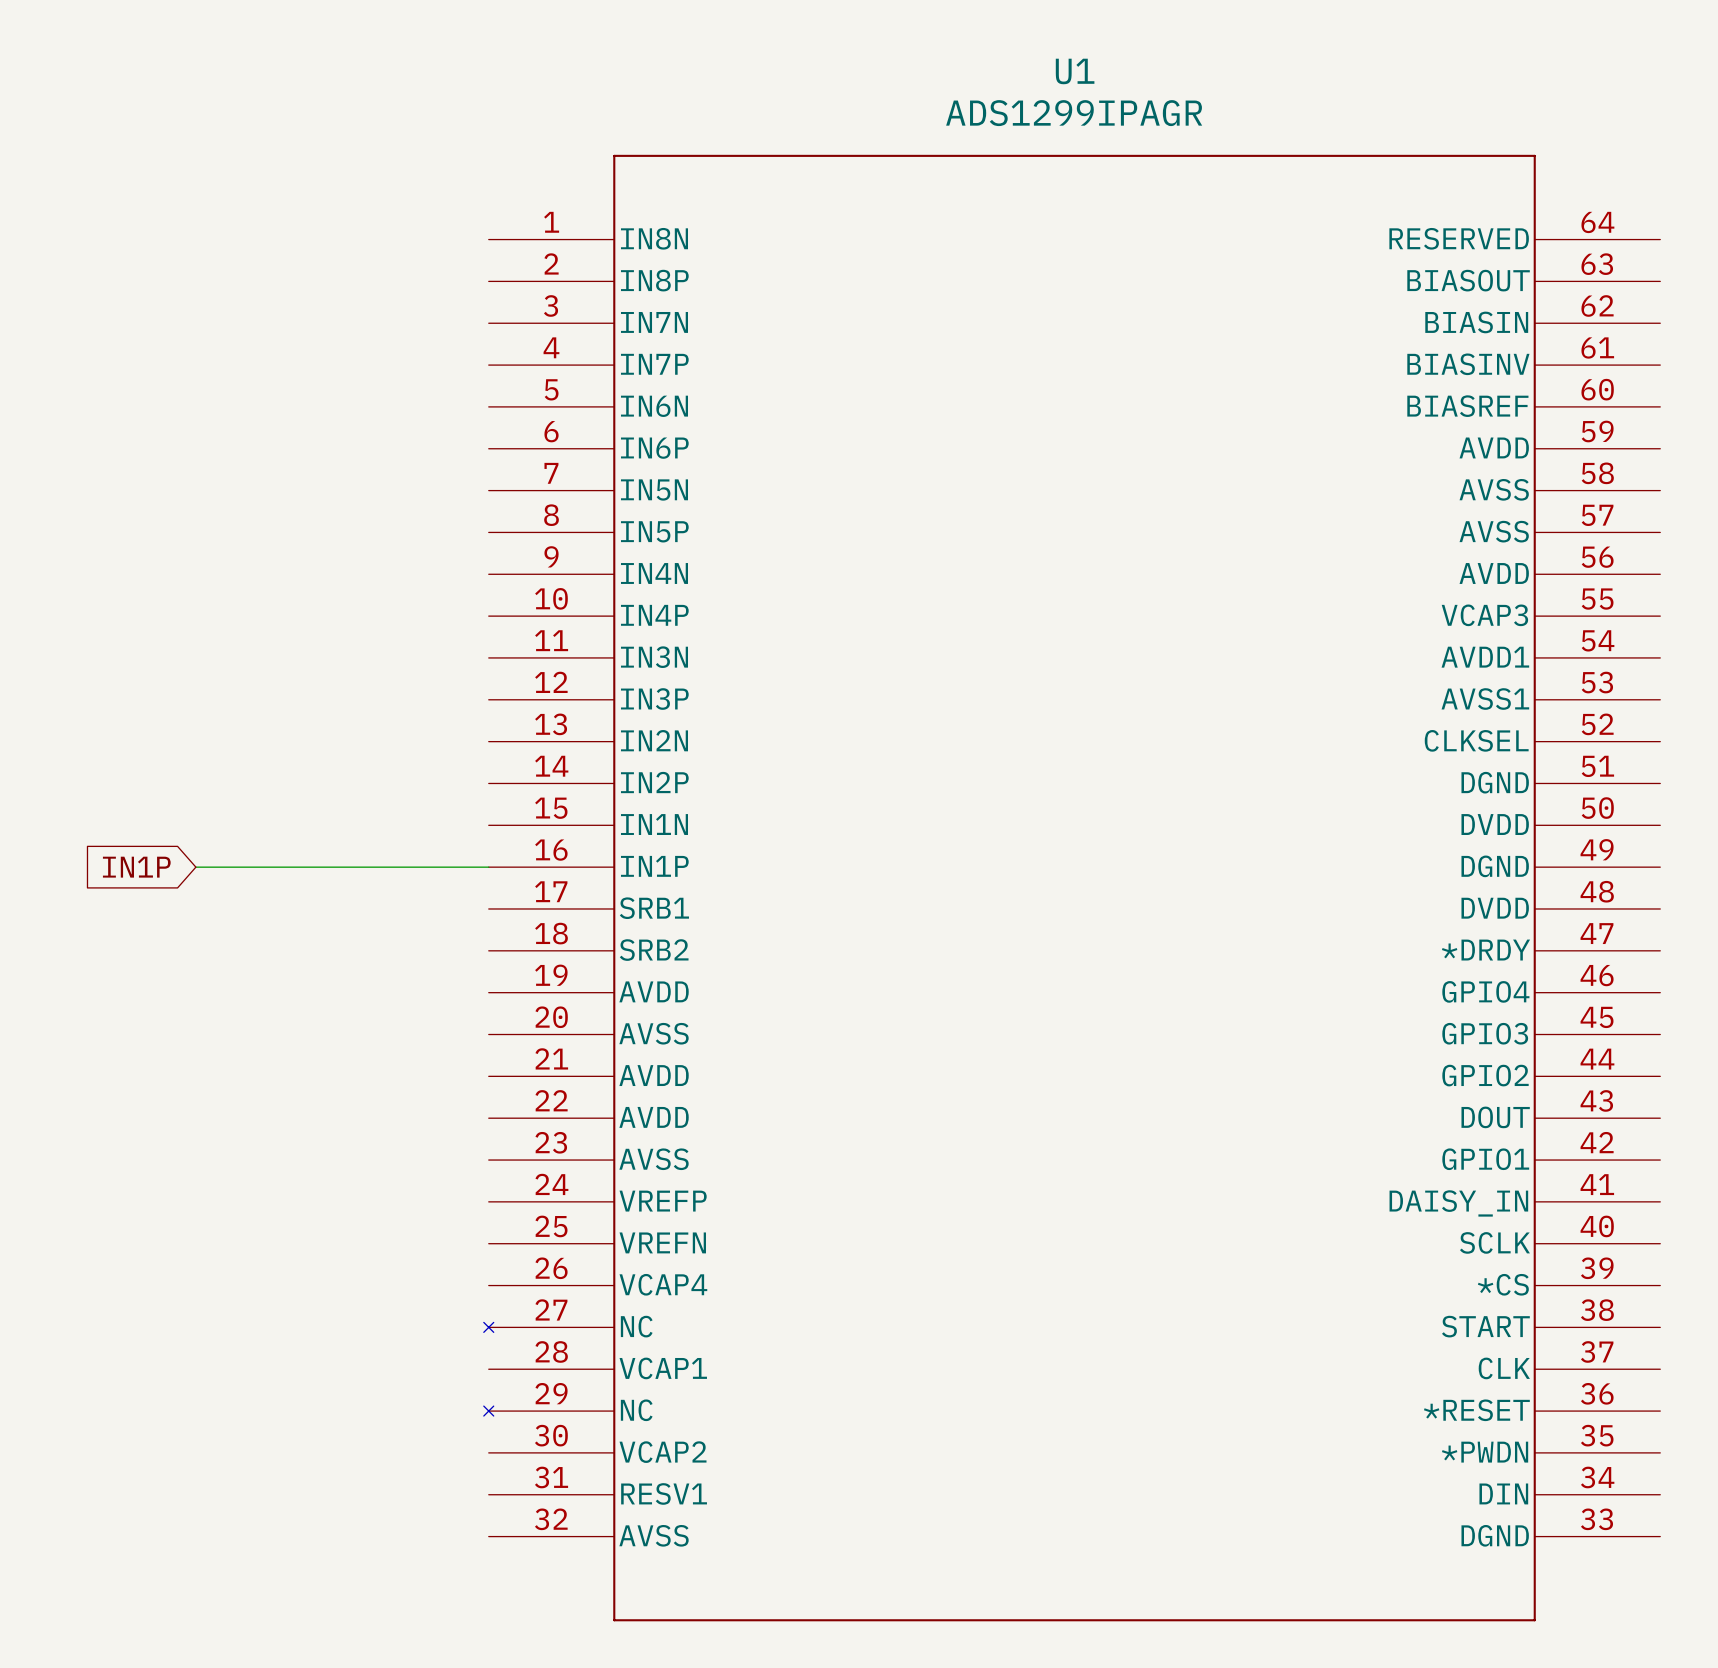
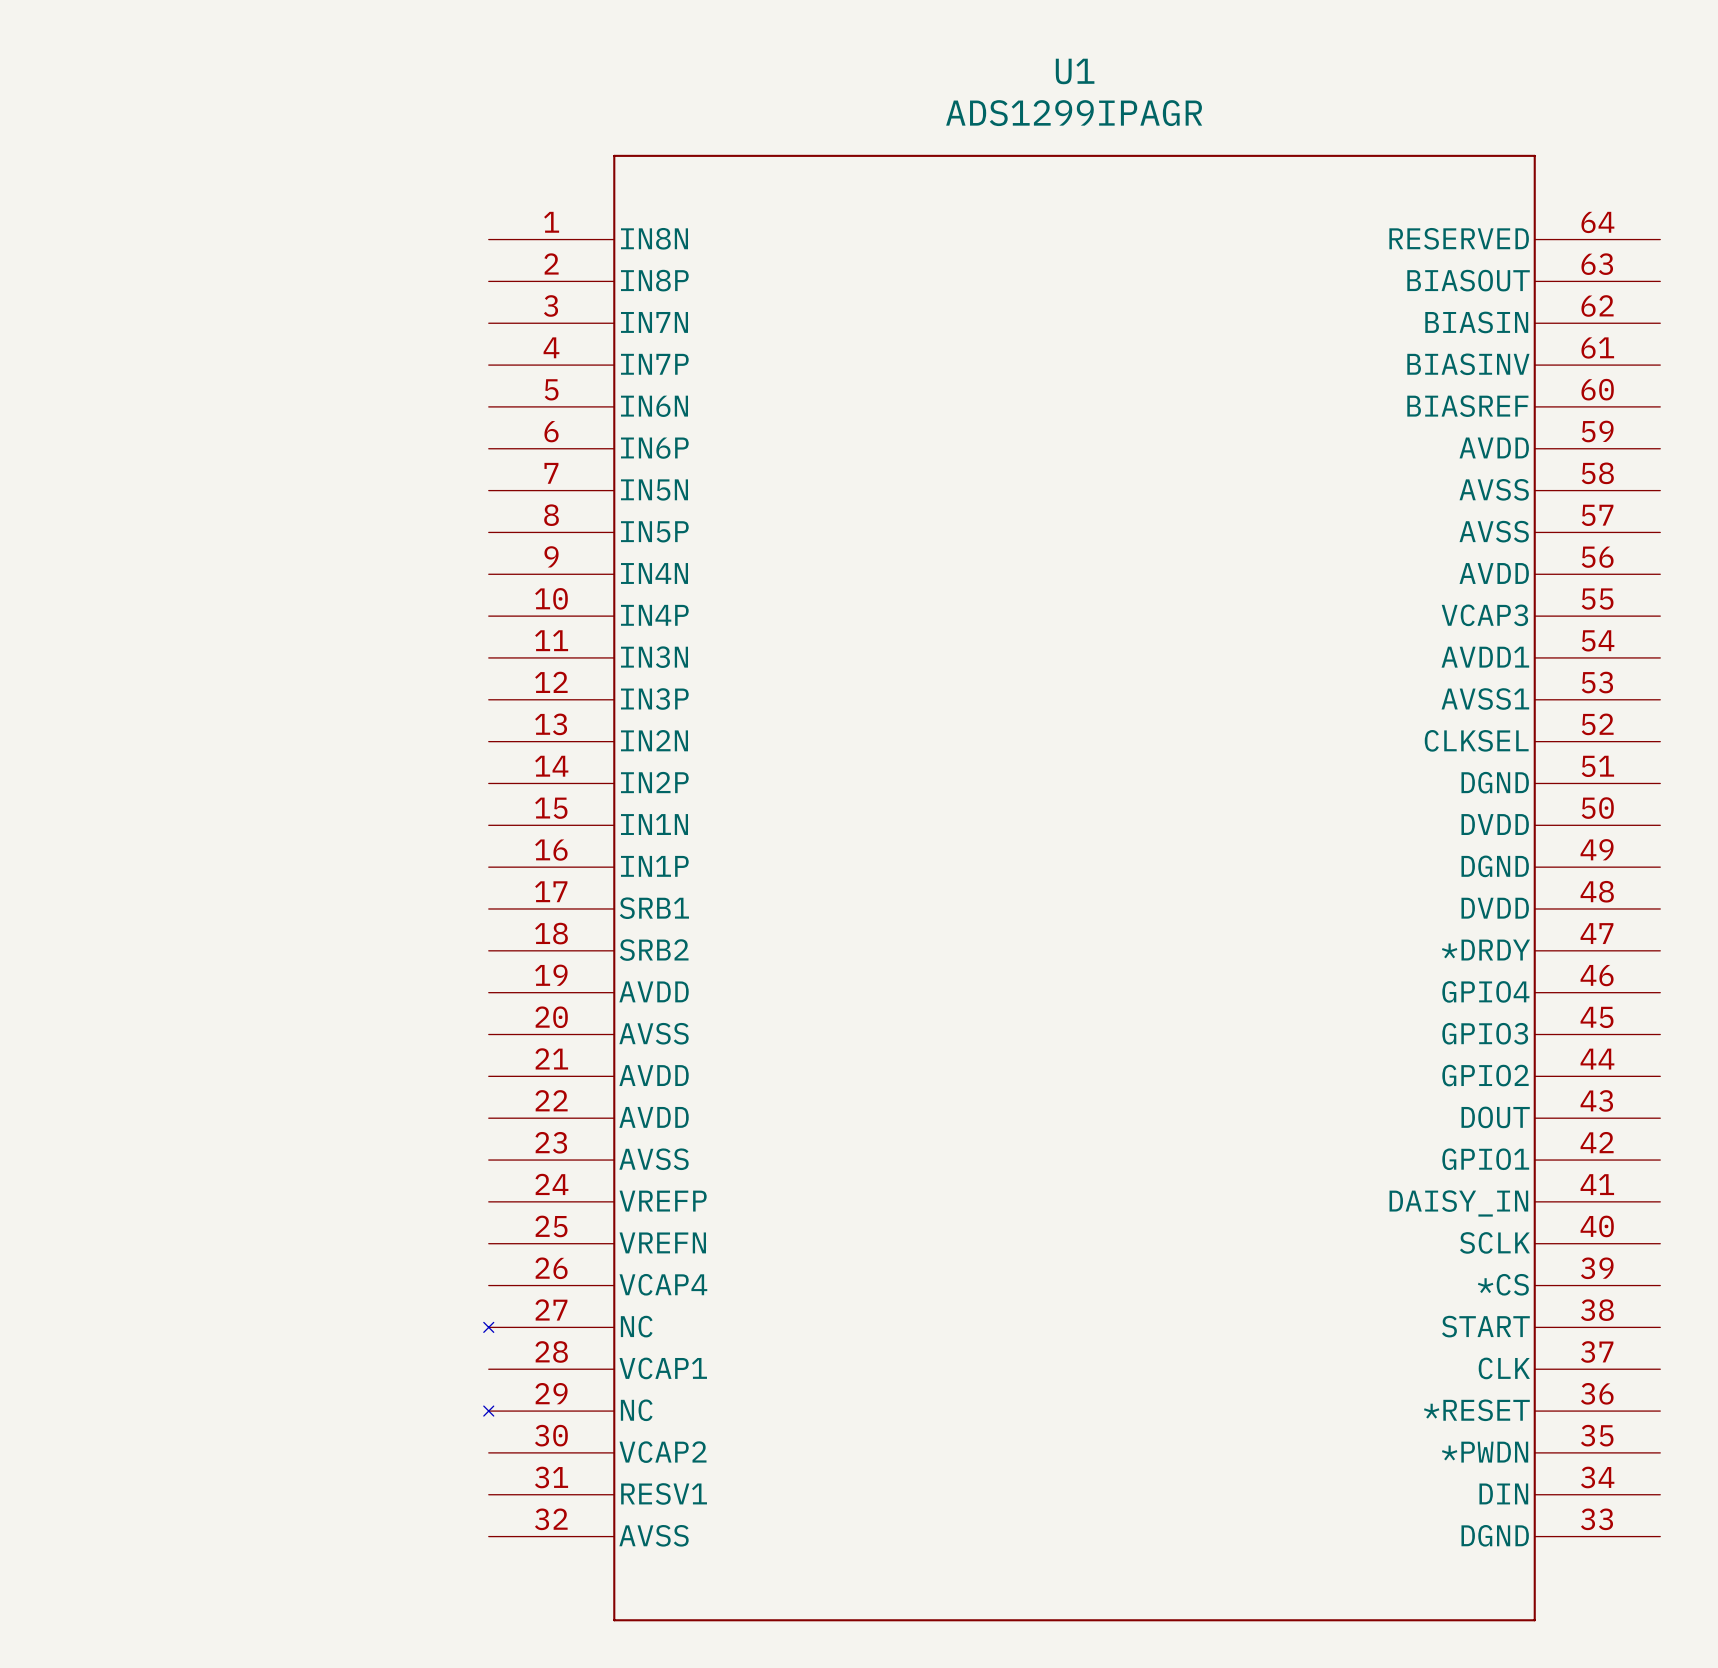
global label: IN1P (136, 867) -> none
wire: (195, 867) (488, 867) -> none

